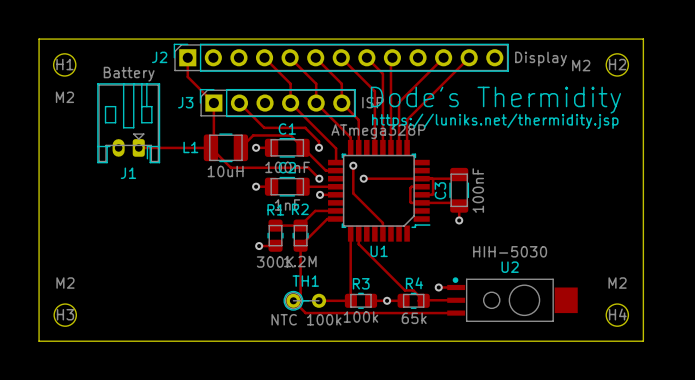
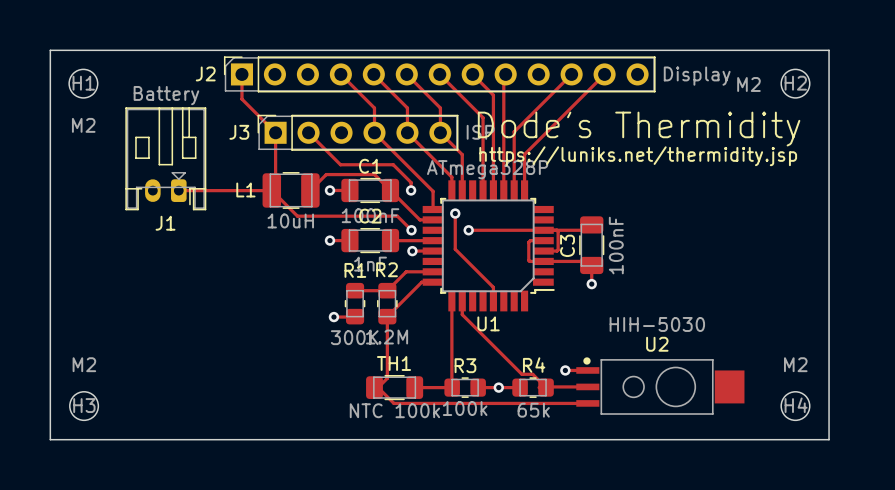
TH1 footprint: [283, 290, 327, 311] -> [366, 375, 424, 401]

